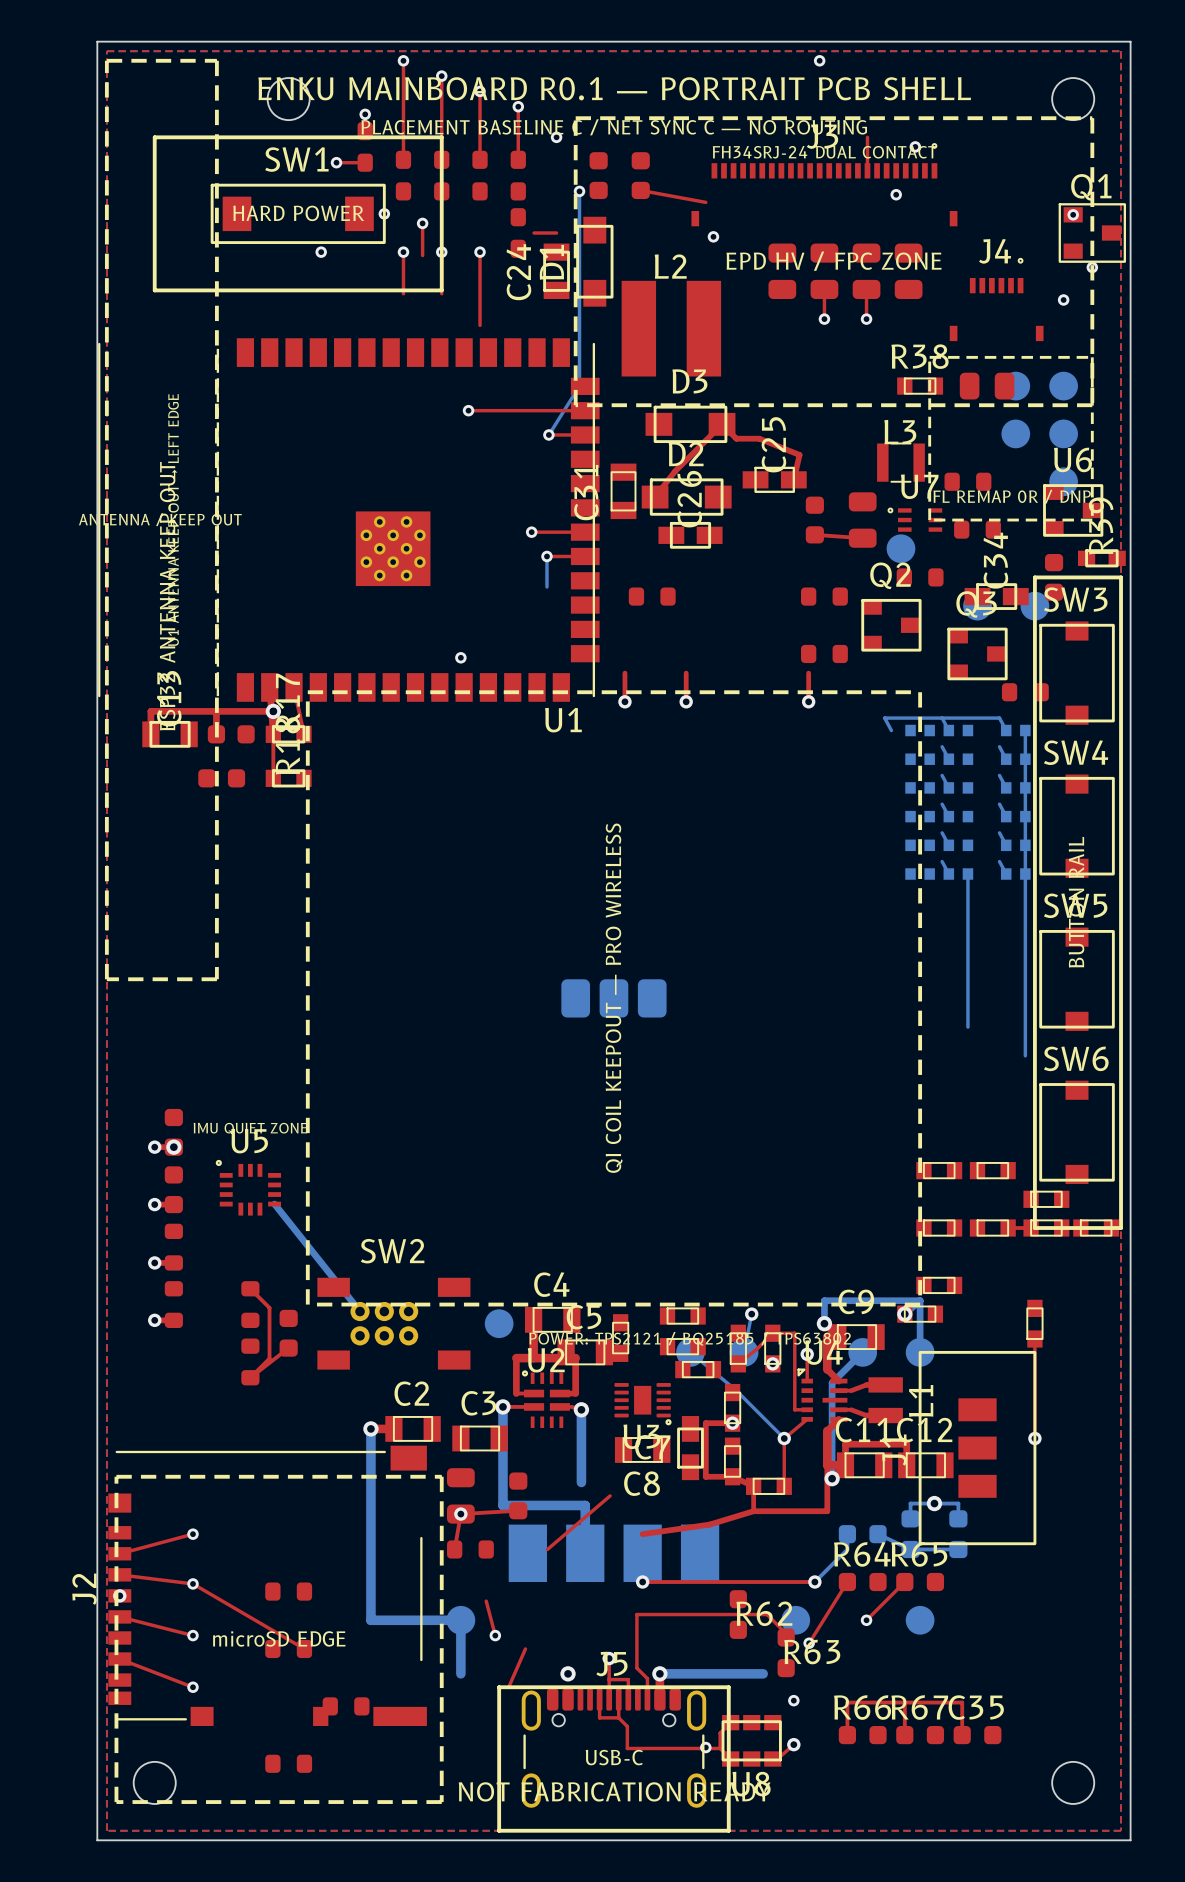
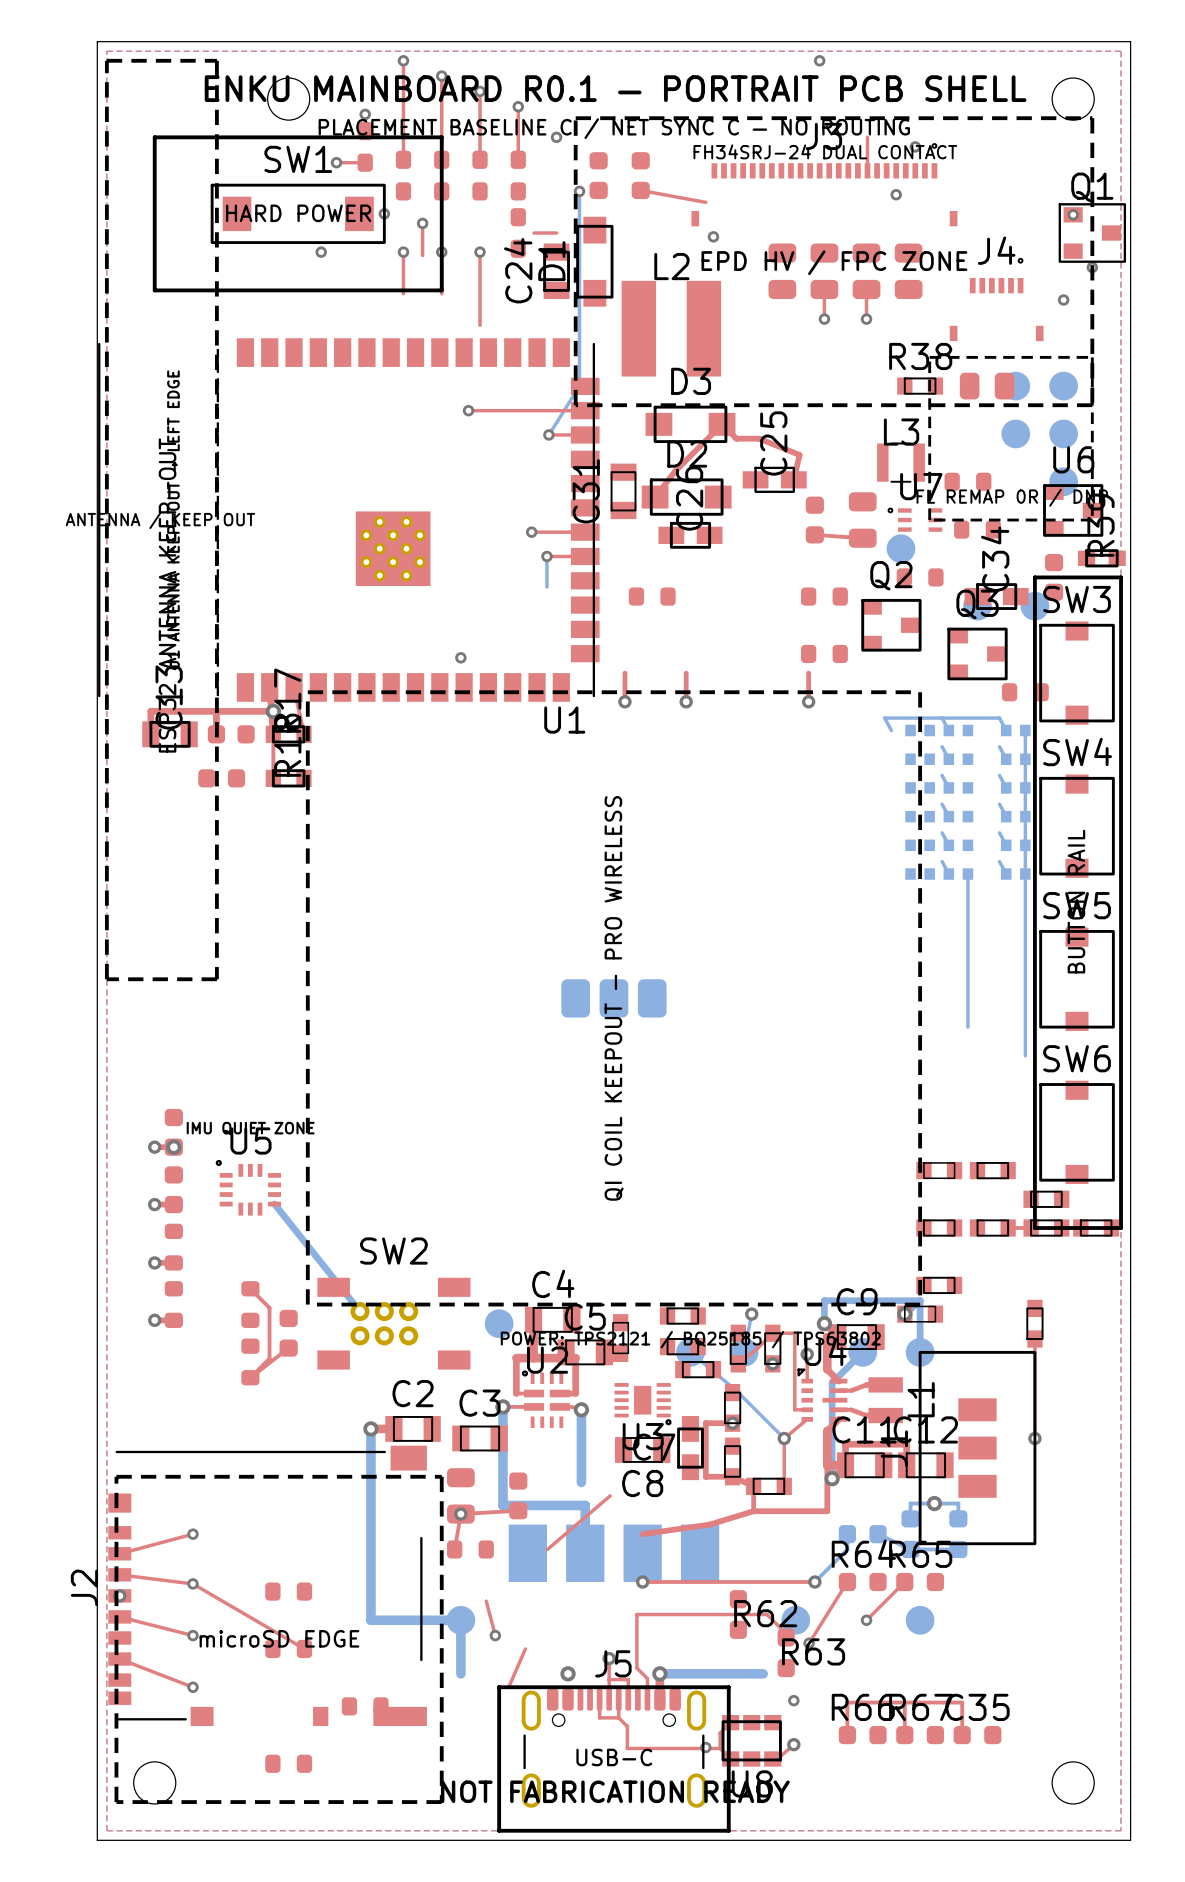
part position: (346, 1706) -> (365, 1706)

